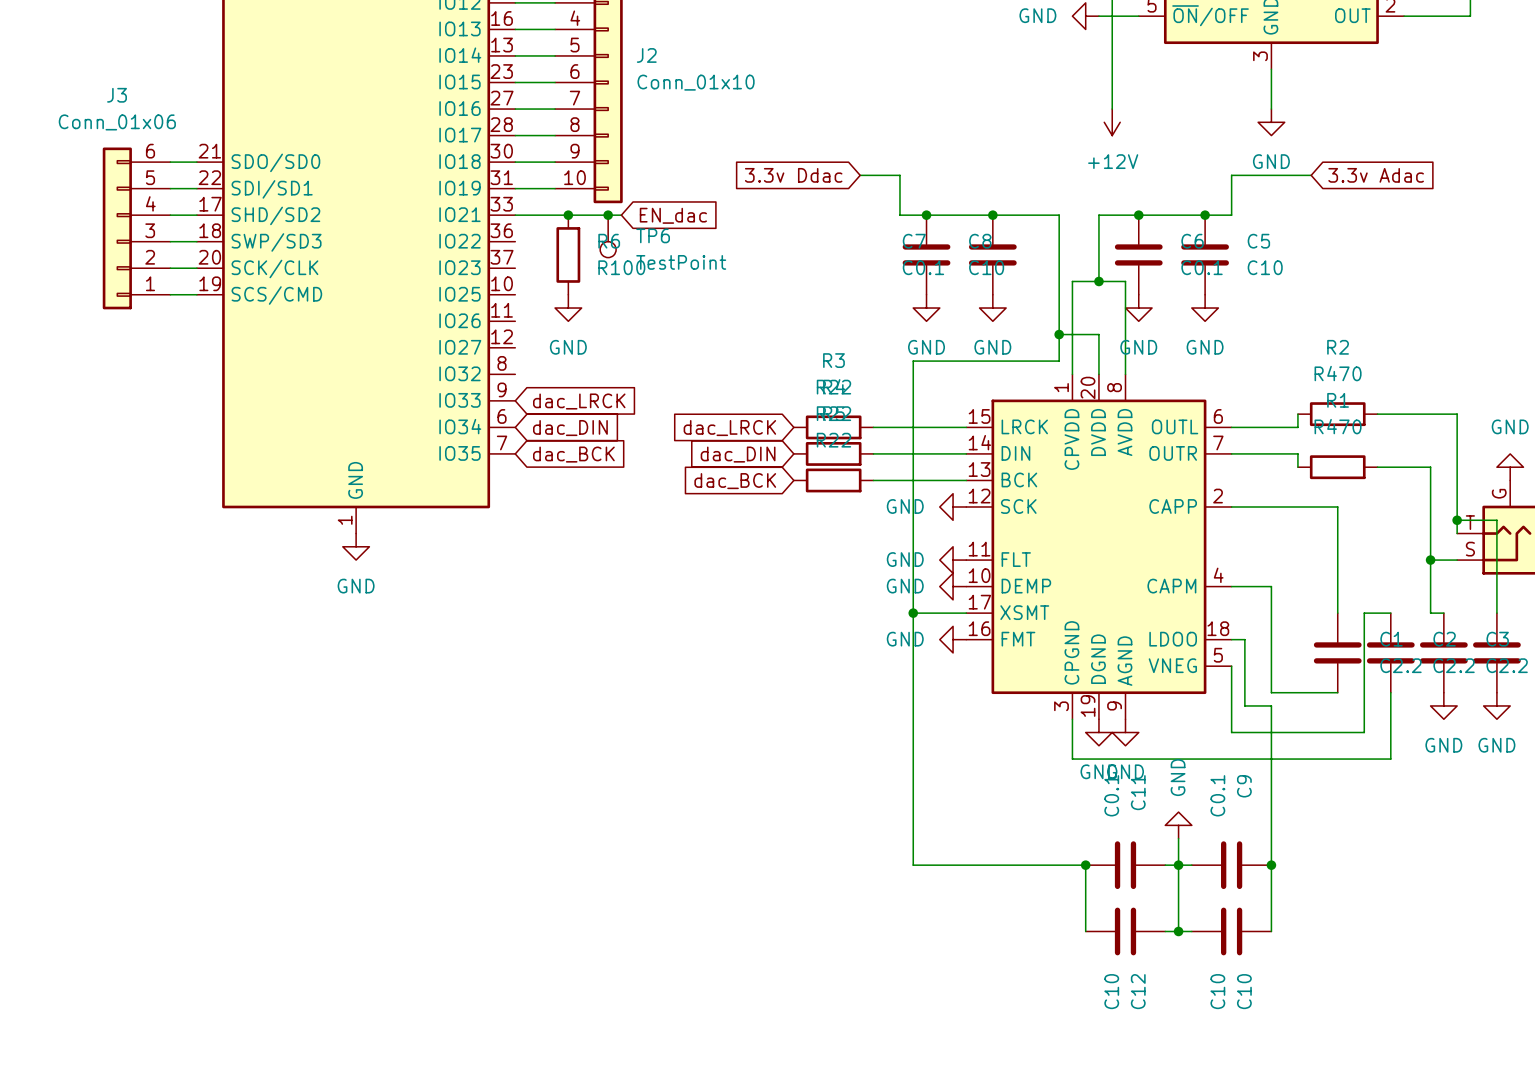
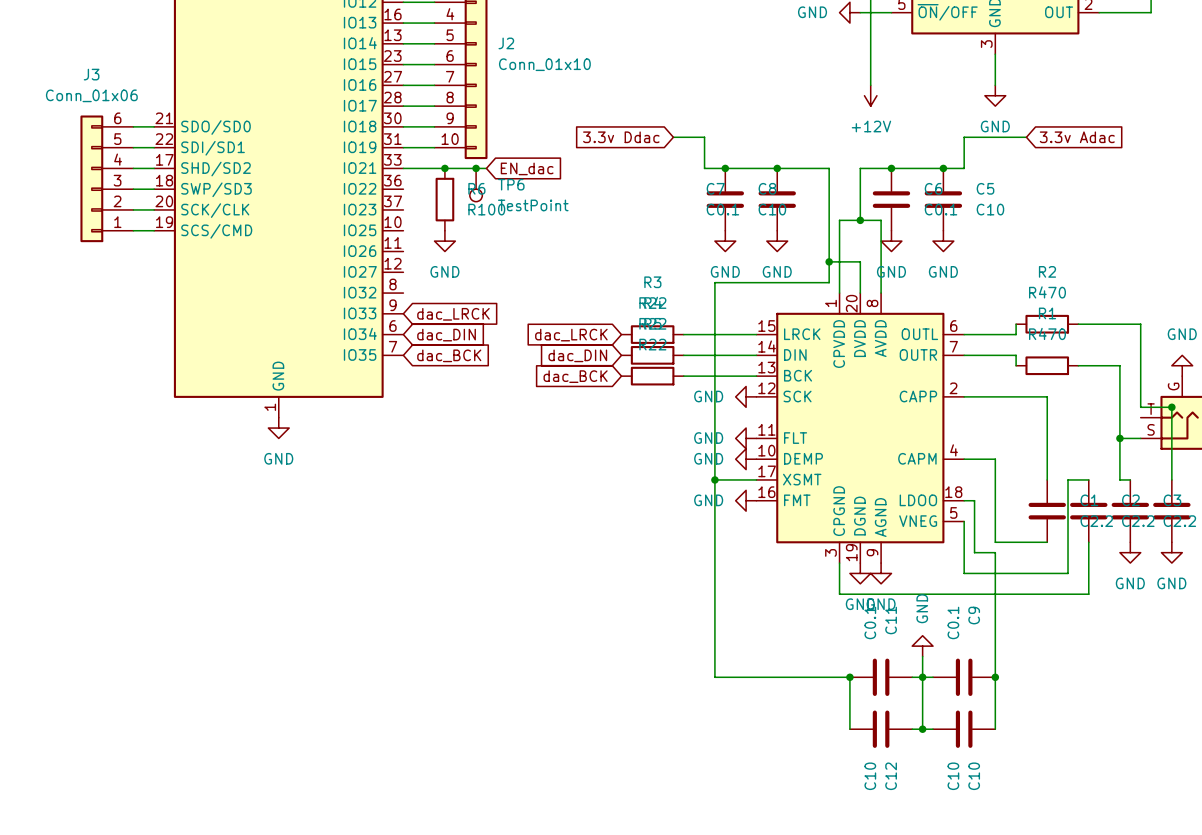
wire: (1457, 520) (1457, 533) -> none
junction position: (1457, 520) -> (1171, 407)

